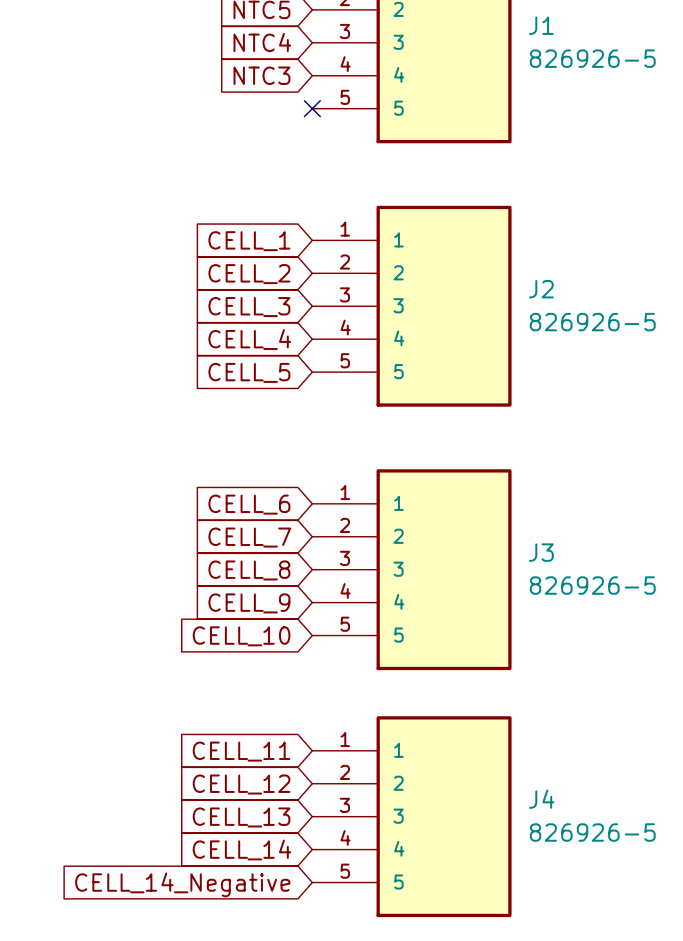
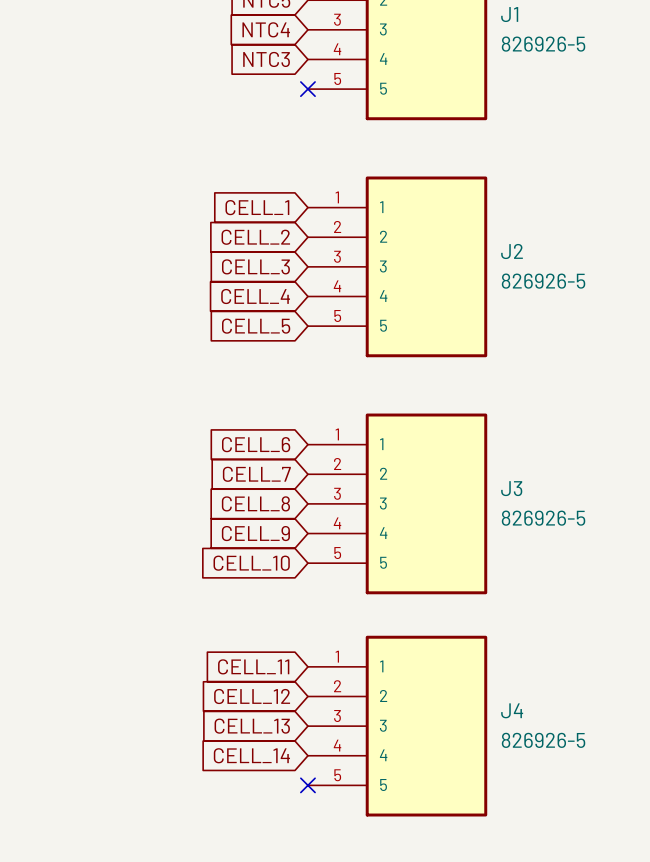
no-connect mark: none -> (307, 785)
global label: CELL_14_Negative (182, 884) -> none

